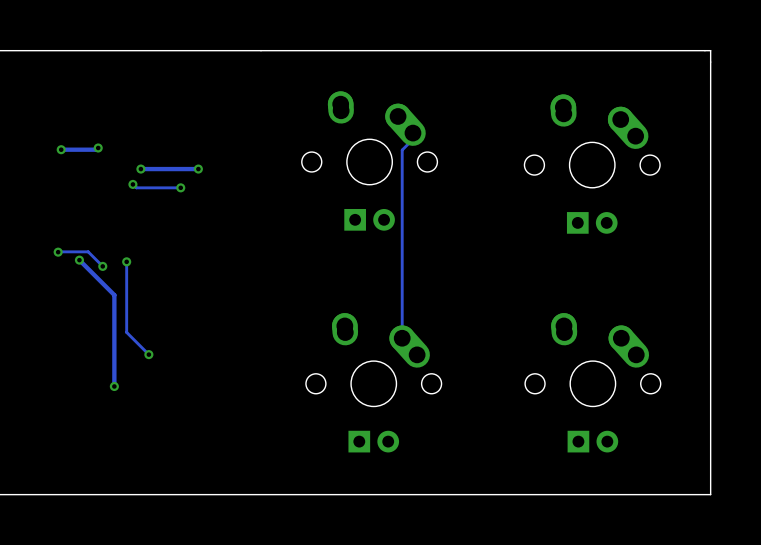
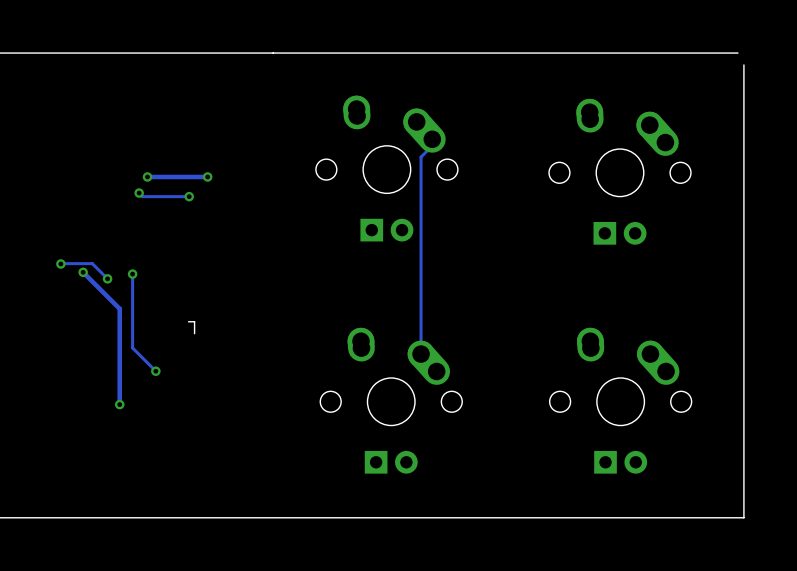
board edge: (704, 50) (710, 50) (710, 62) -> none
track: (98, 148) (96, 149) (61, 149) -> none
via: (98, 148) -> none
via: (61, 149) -> none
board edge: none -> (188, 321) (194, 321) (194, 333)

